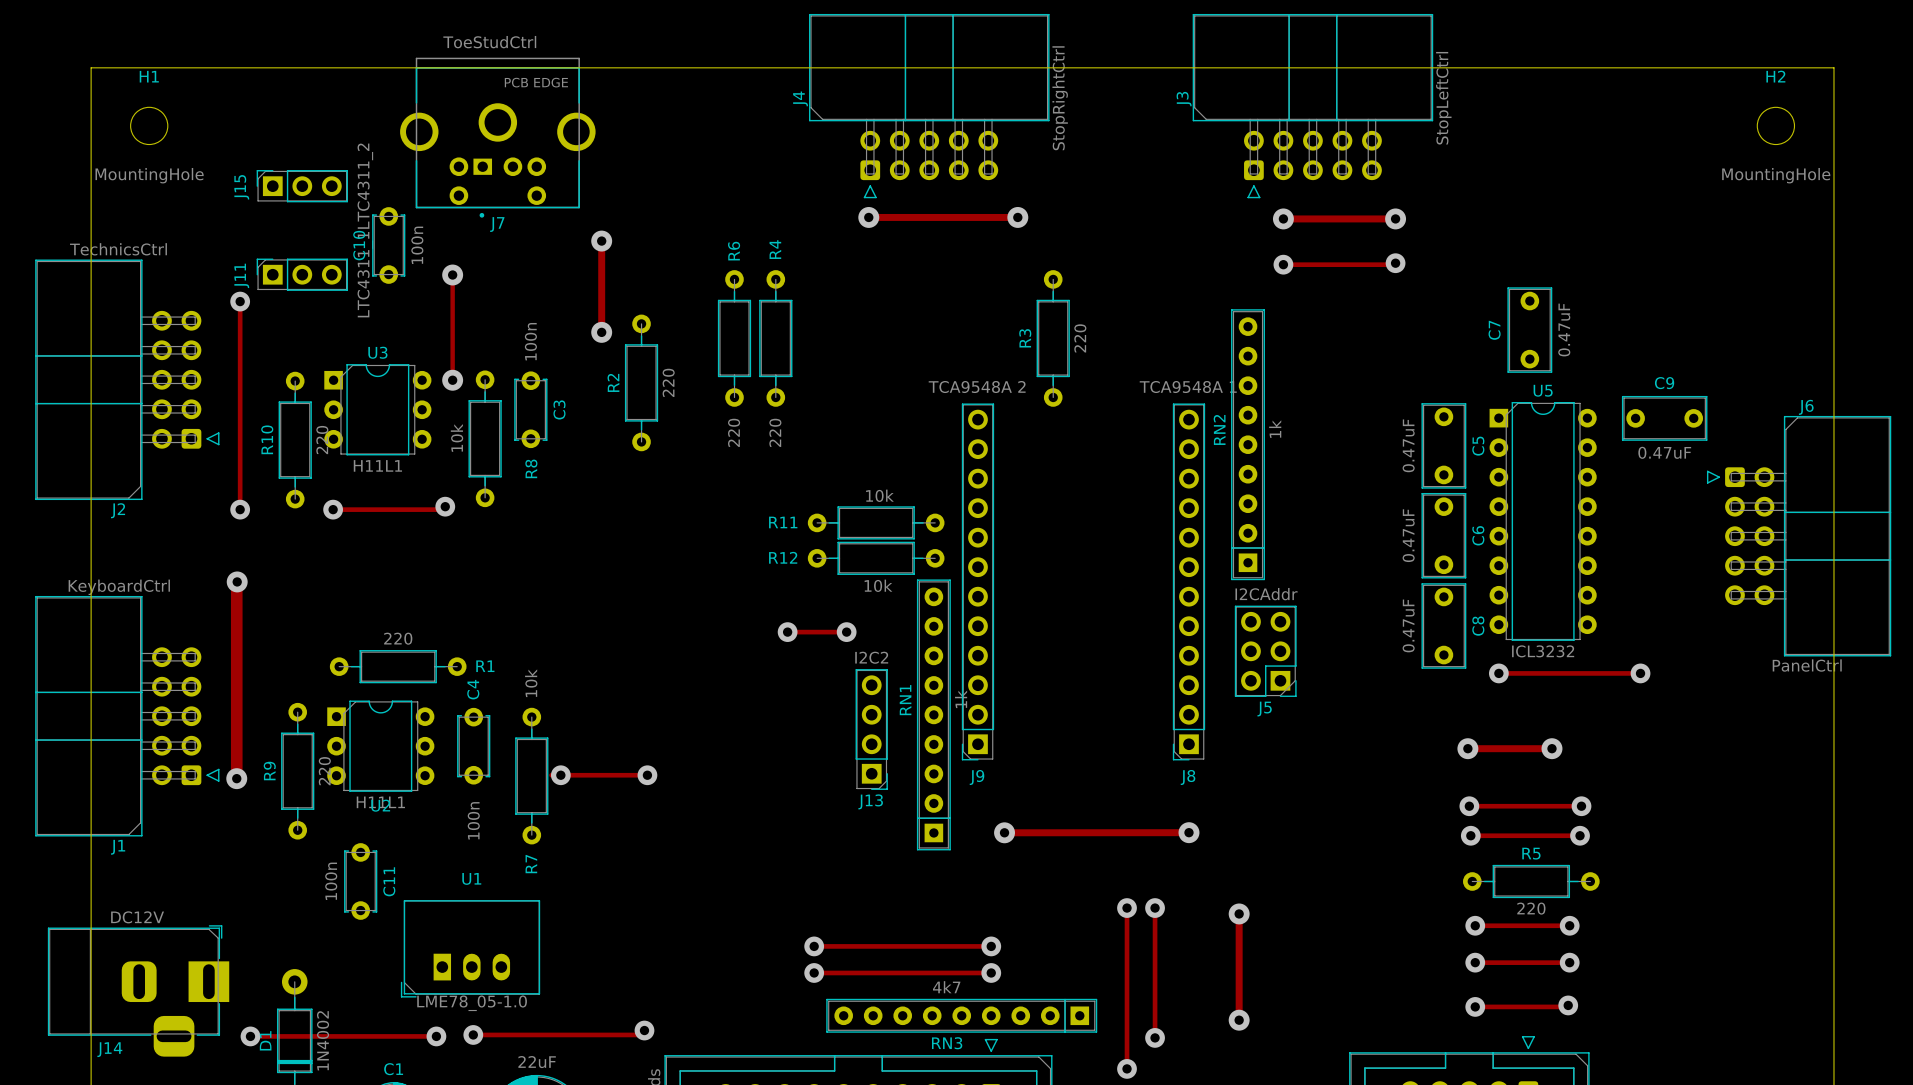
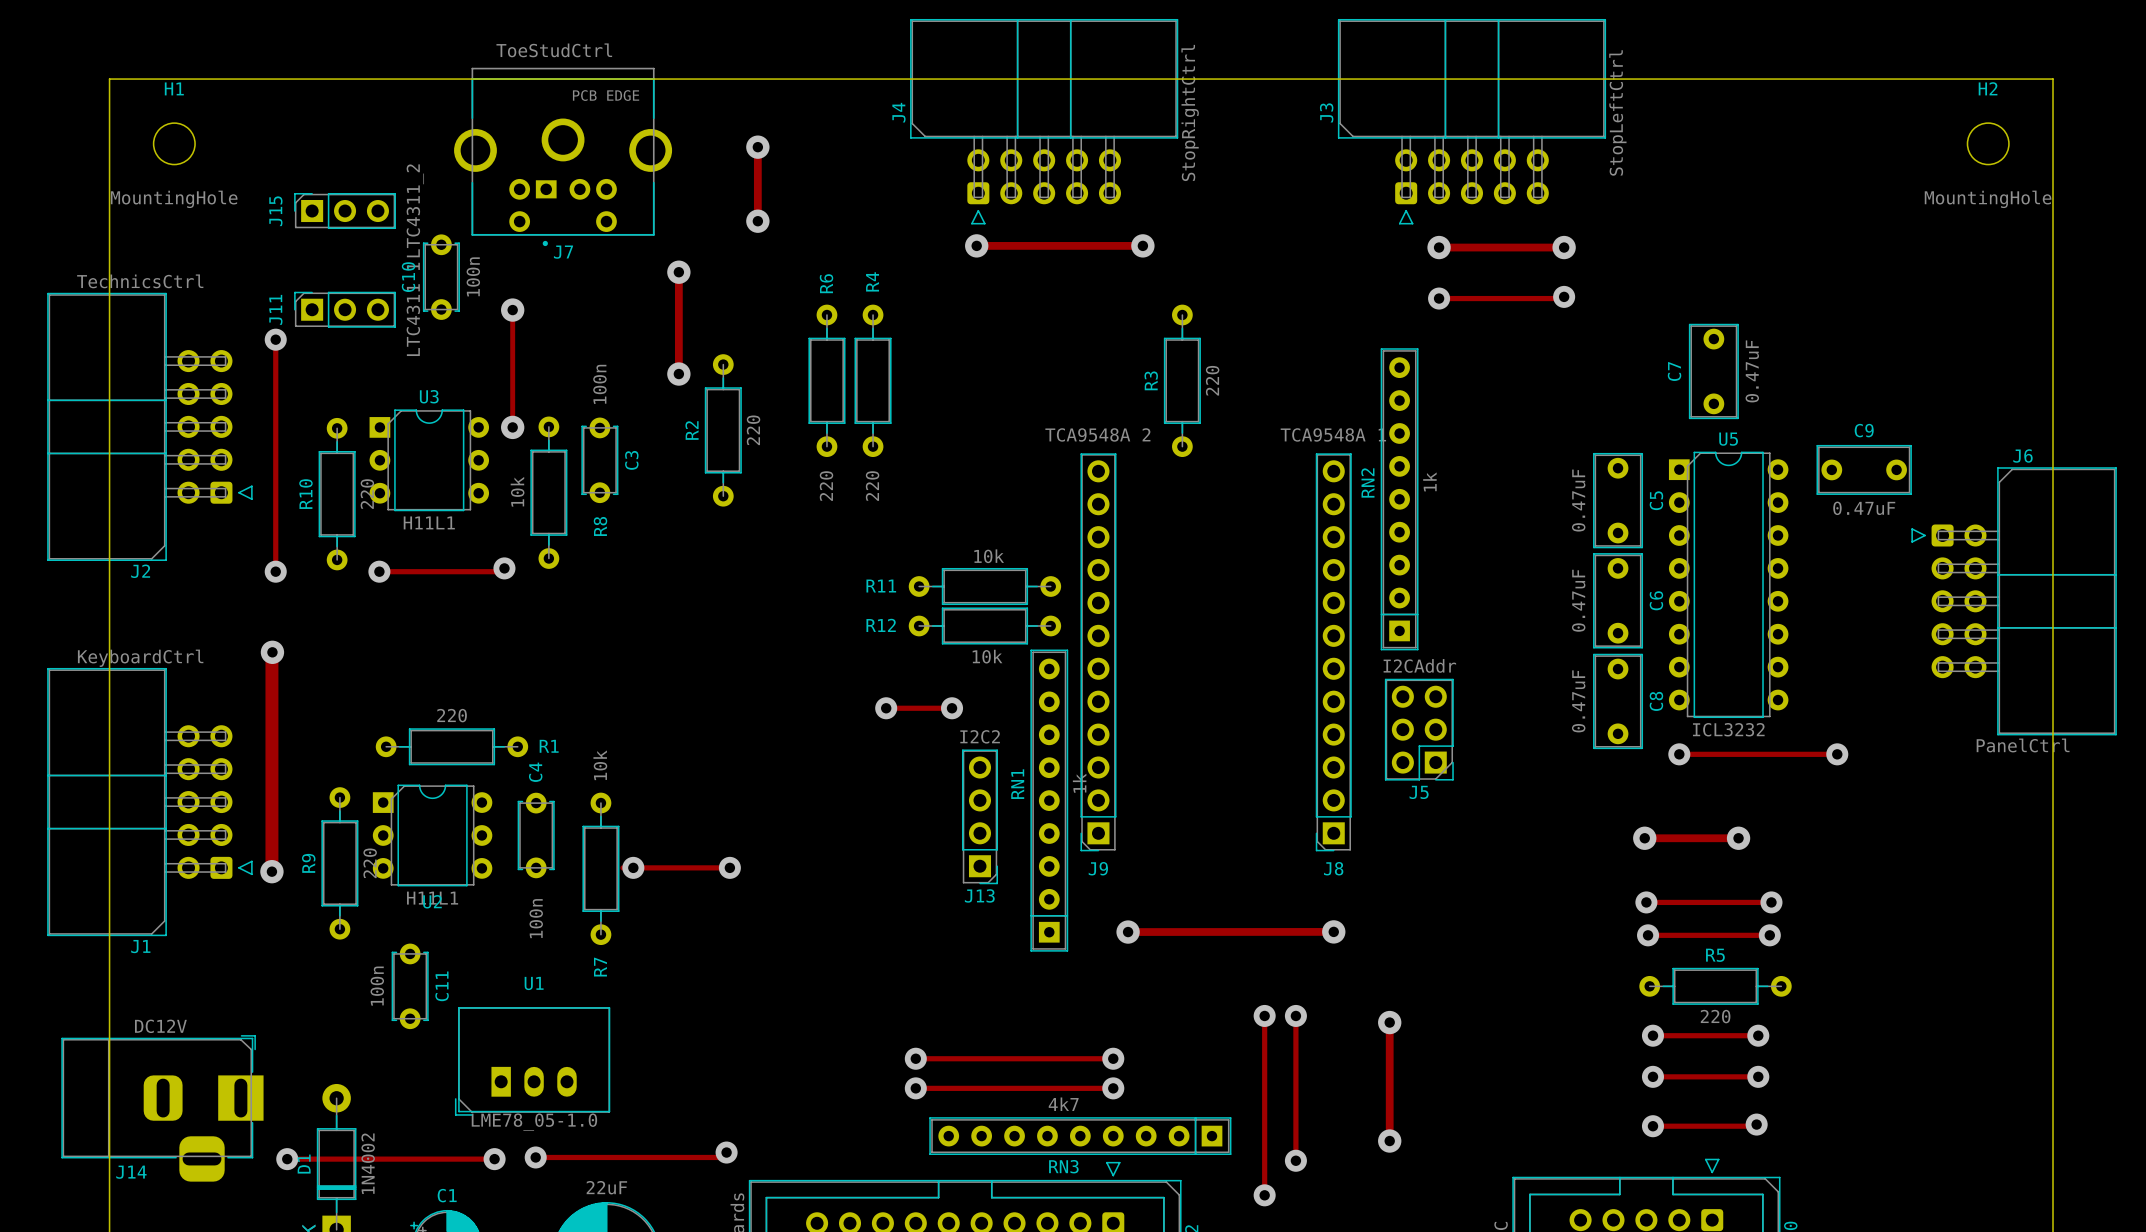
track: none -> (757, 147) (757, 221)
via: none -> (757, 147)
via: none -> (757, 221)

